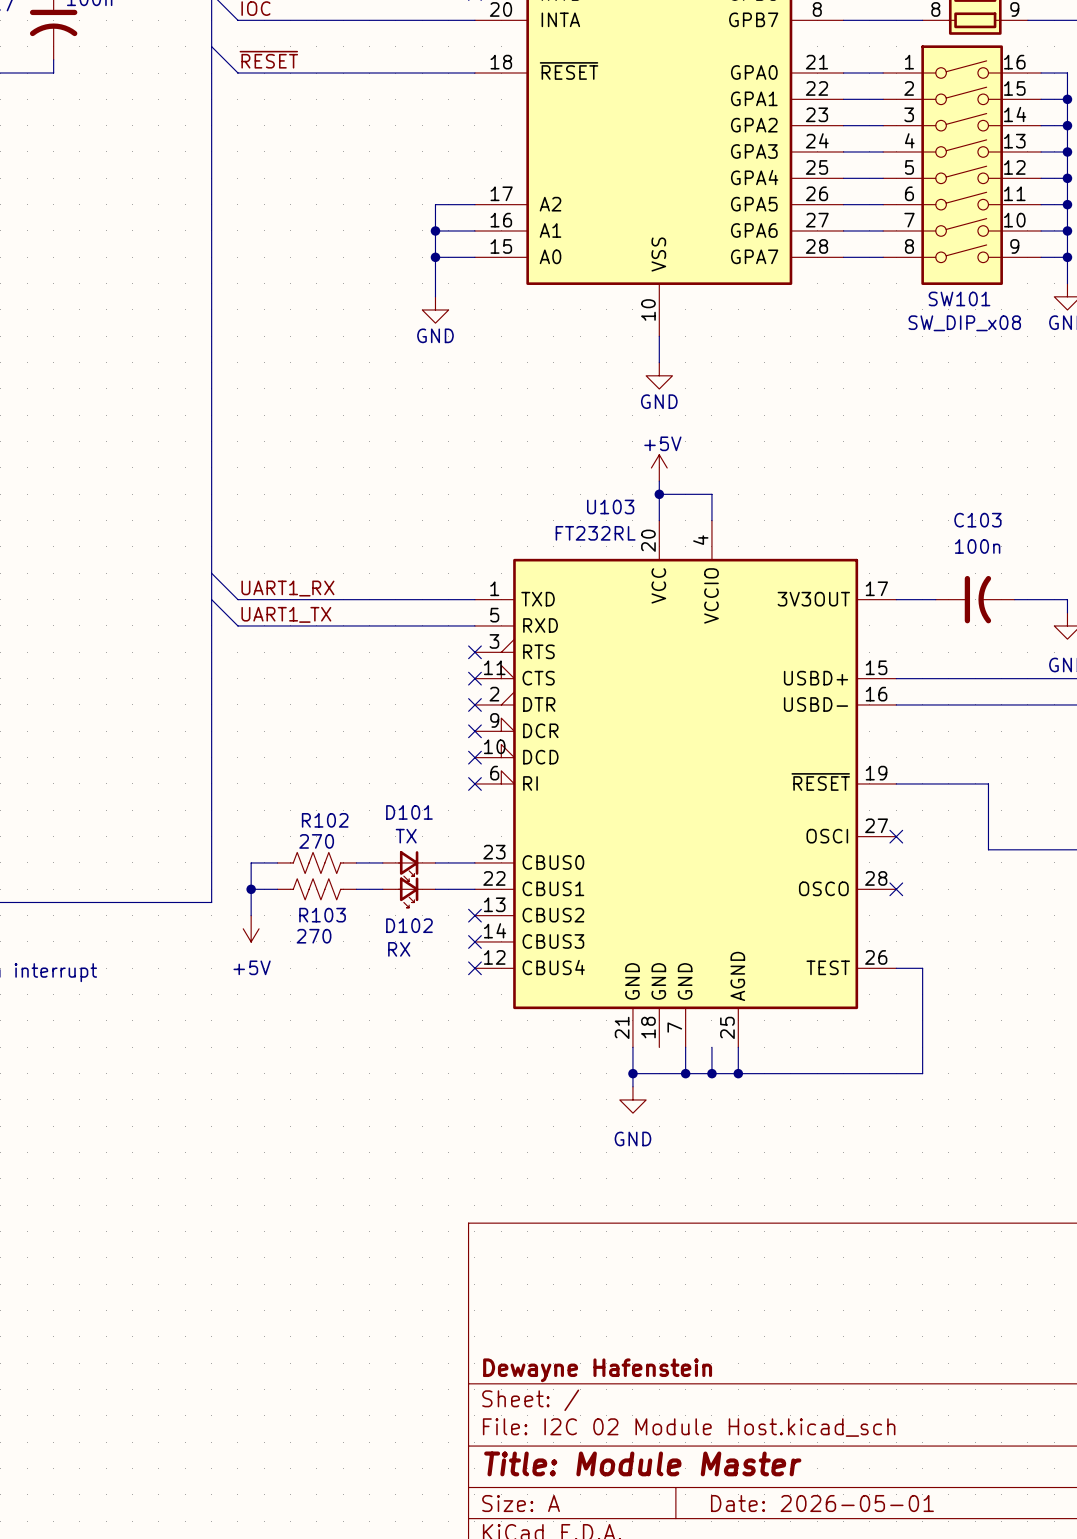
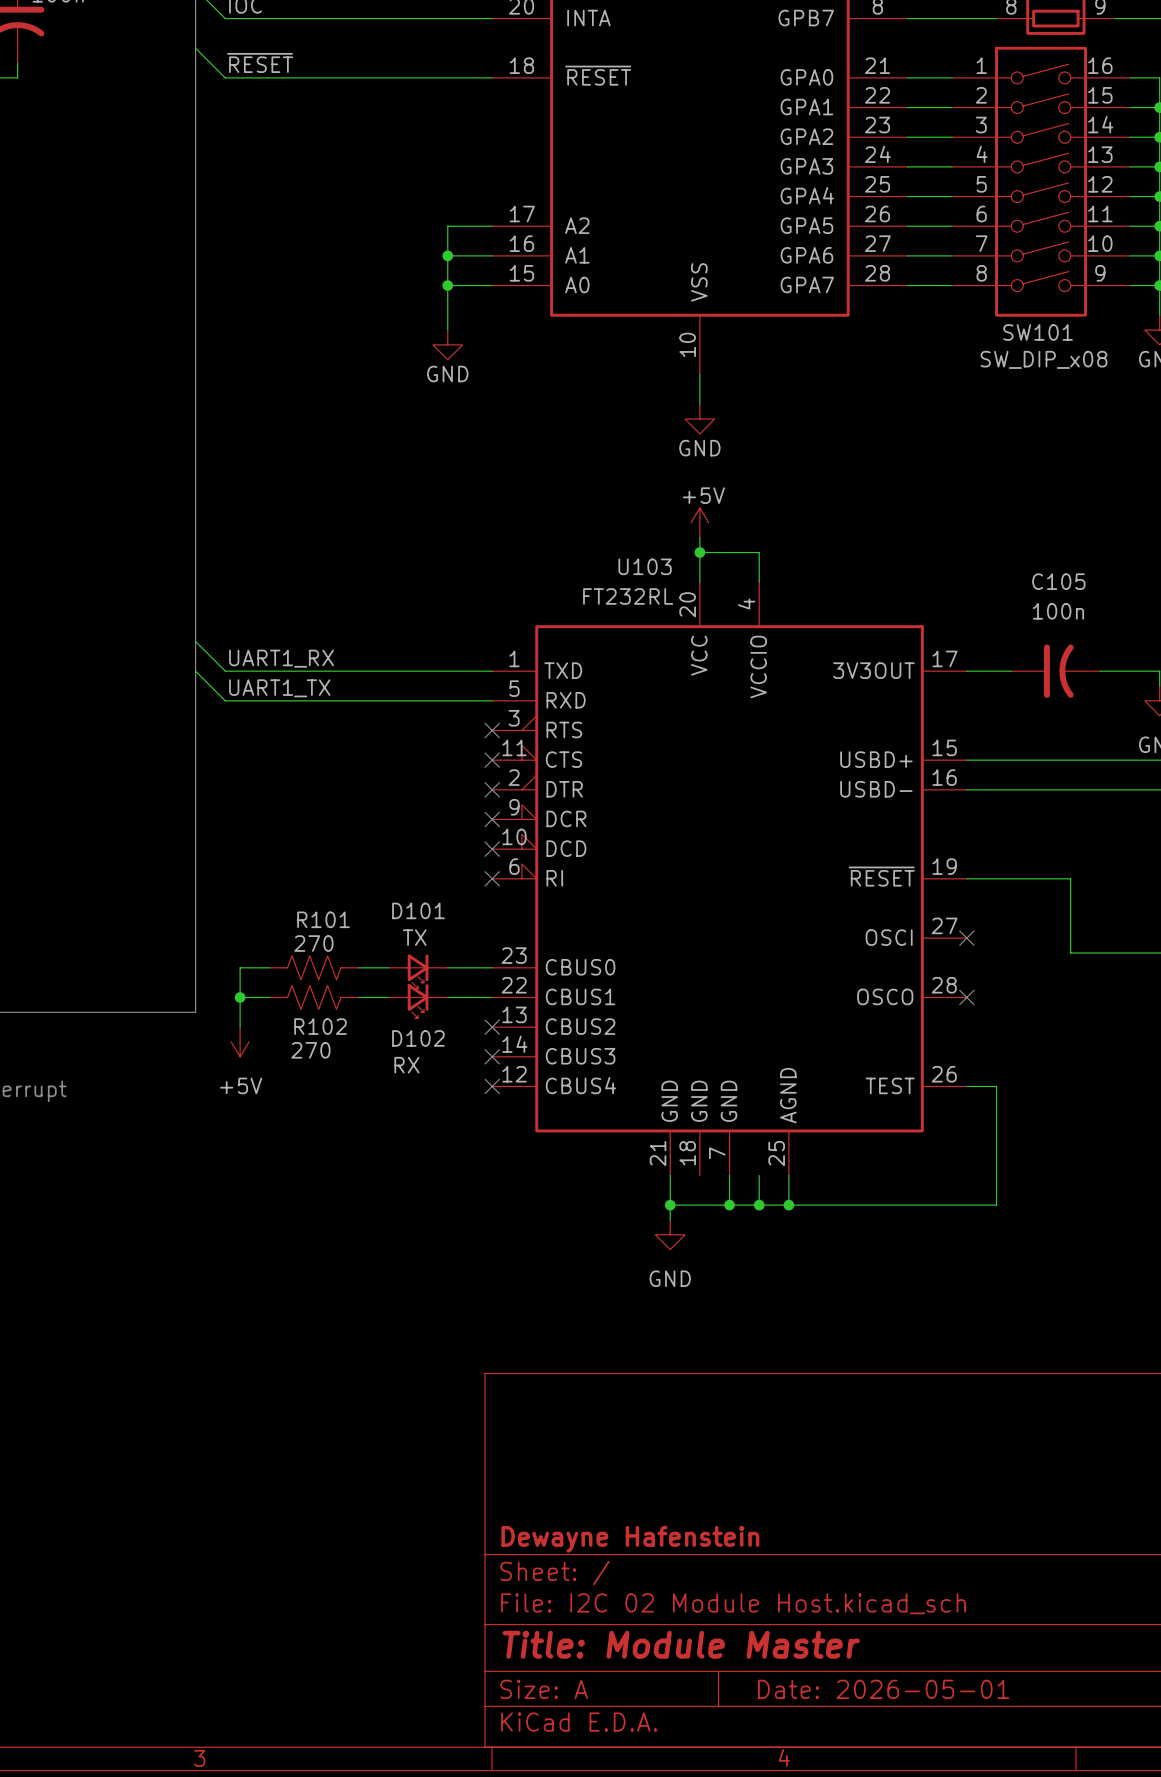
C103 name: C103 (977, 520) -> C105 (1058, 581)
R102 name: R102 (325, 820) -> R101 (323, 919)
R103 name: R103 (322, 915) -> R102 (320, 1026)

